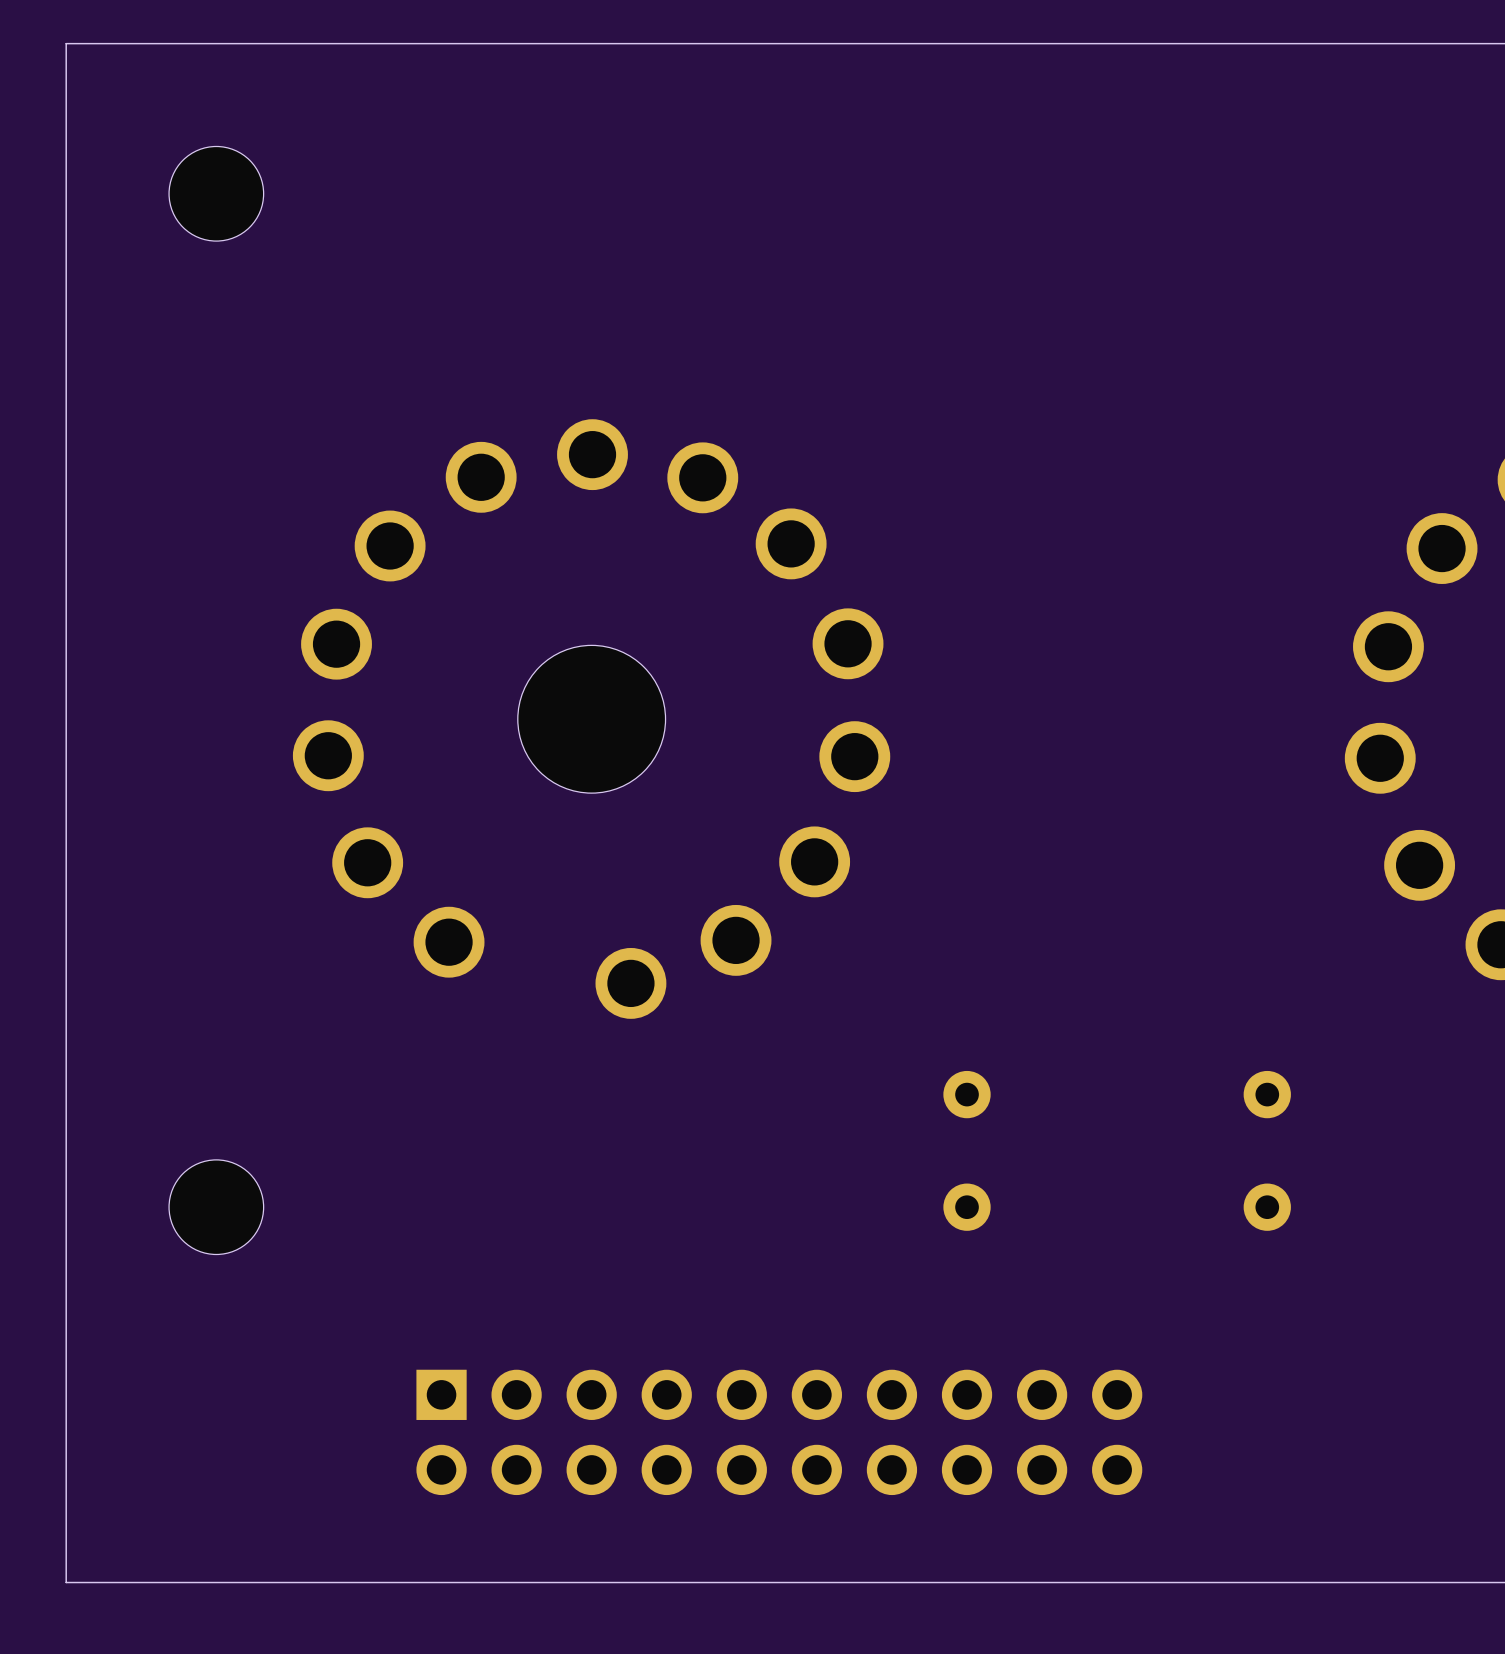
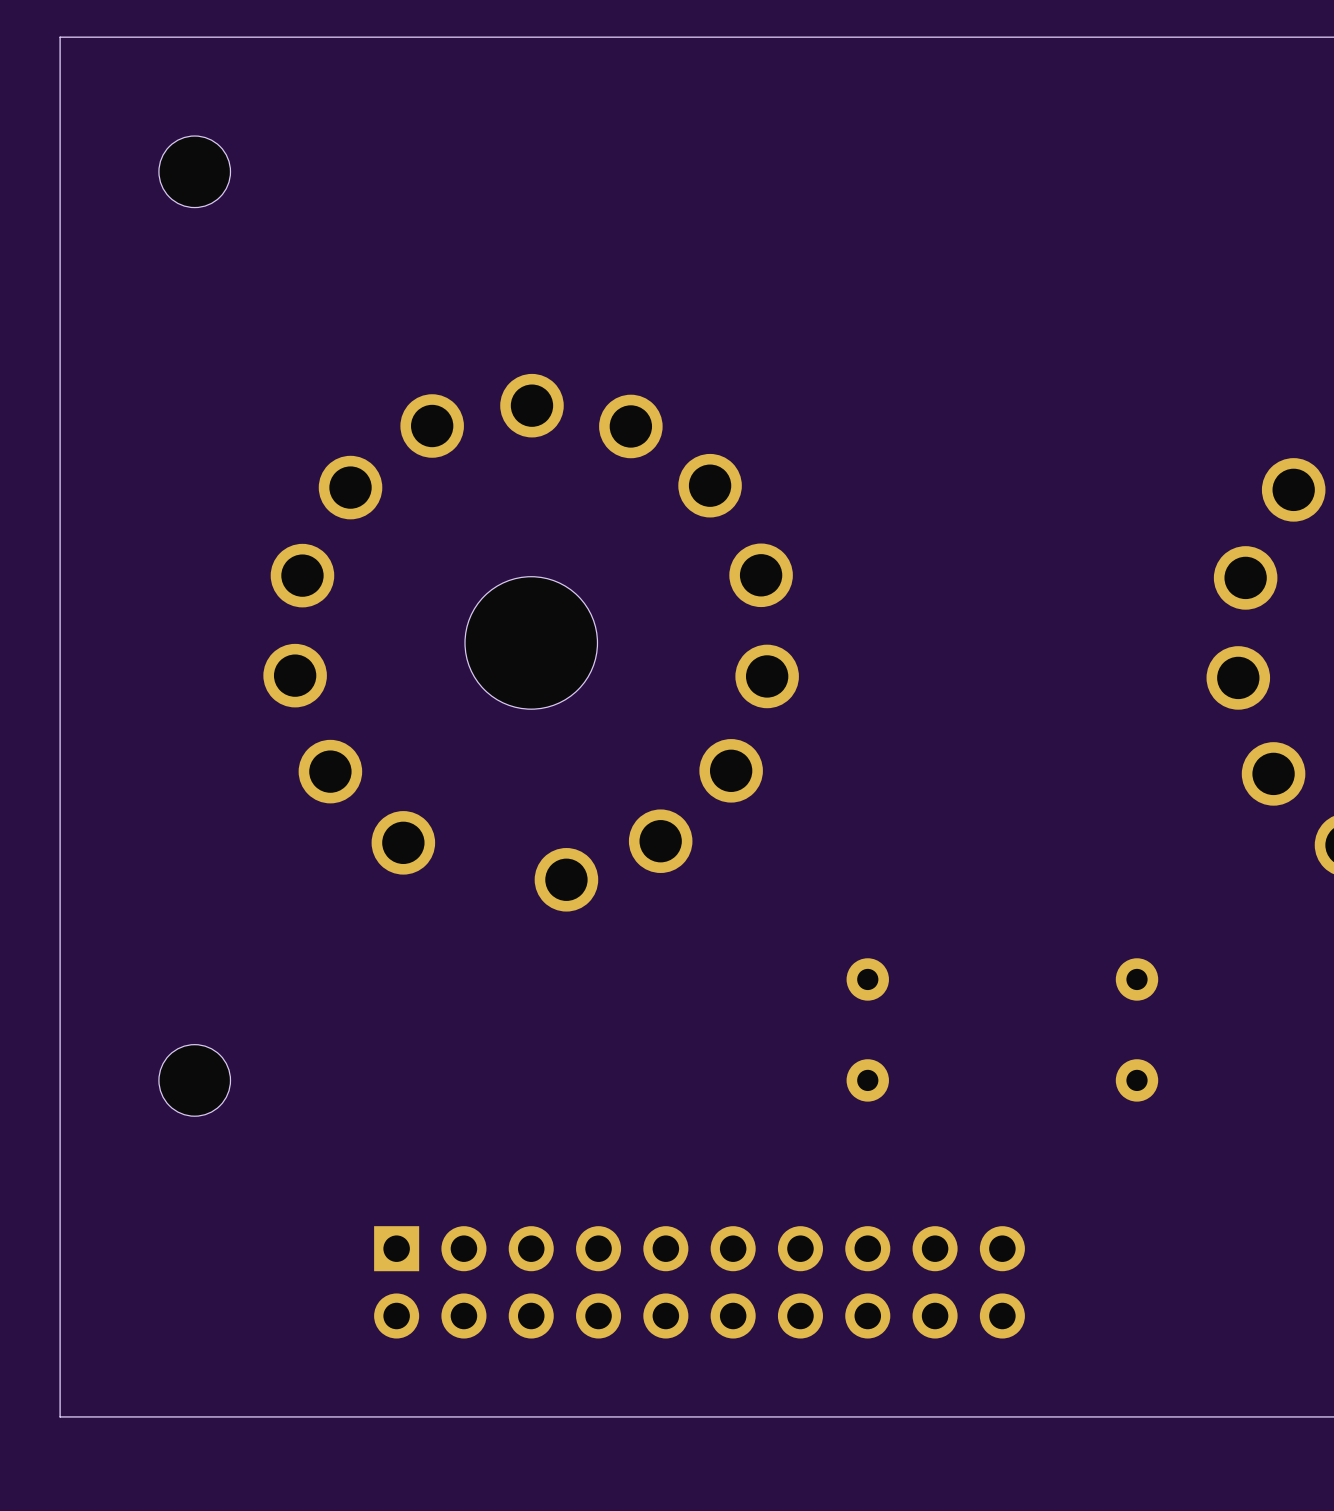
part footprint: [169, 146, 264, 242] -> [158, 136, 231, 208]
part footprint: [169, 1159, 264, 1255] -> [158, 1044, 231, 1117]

